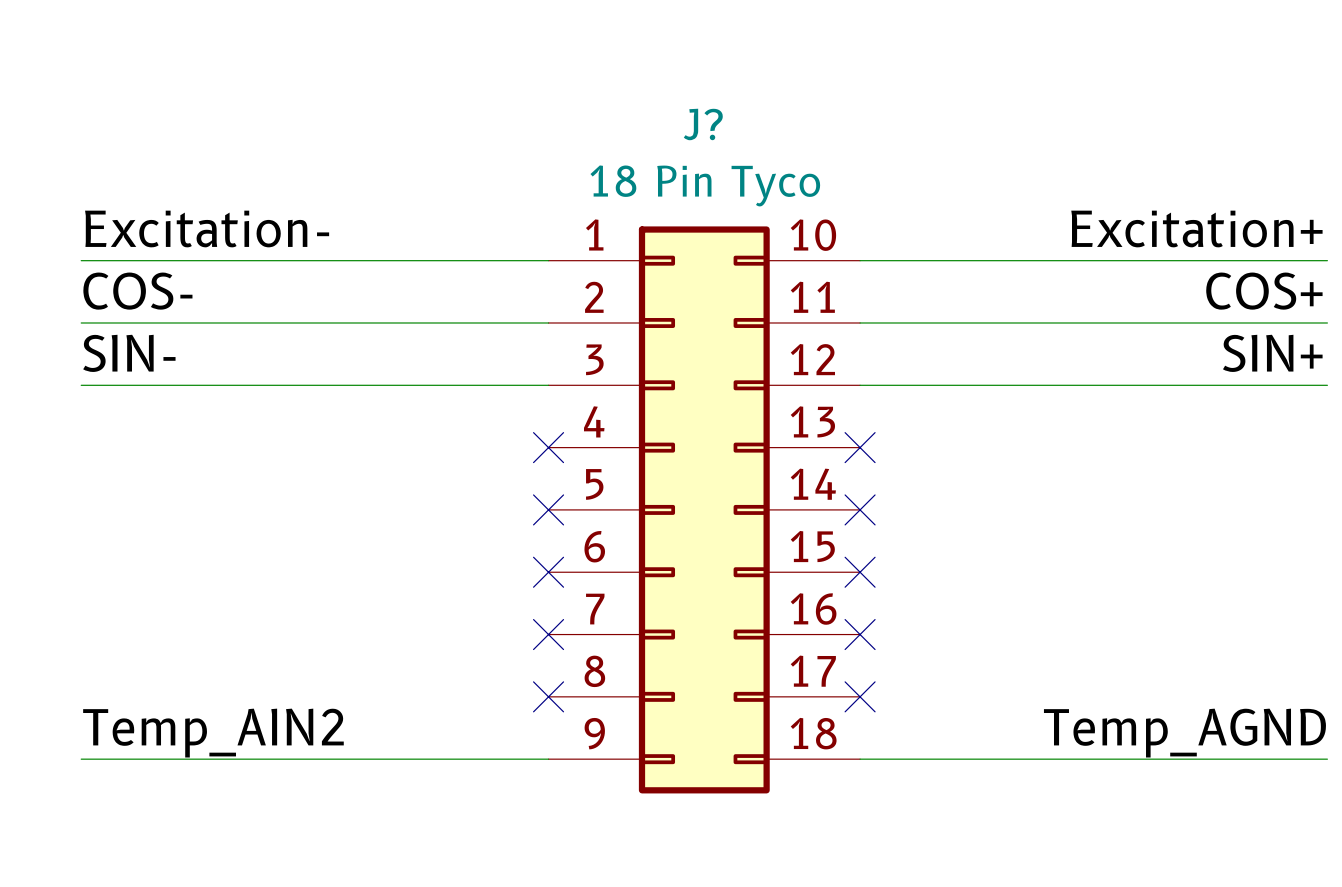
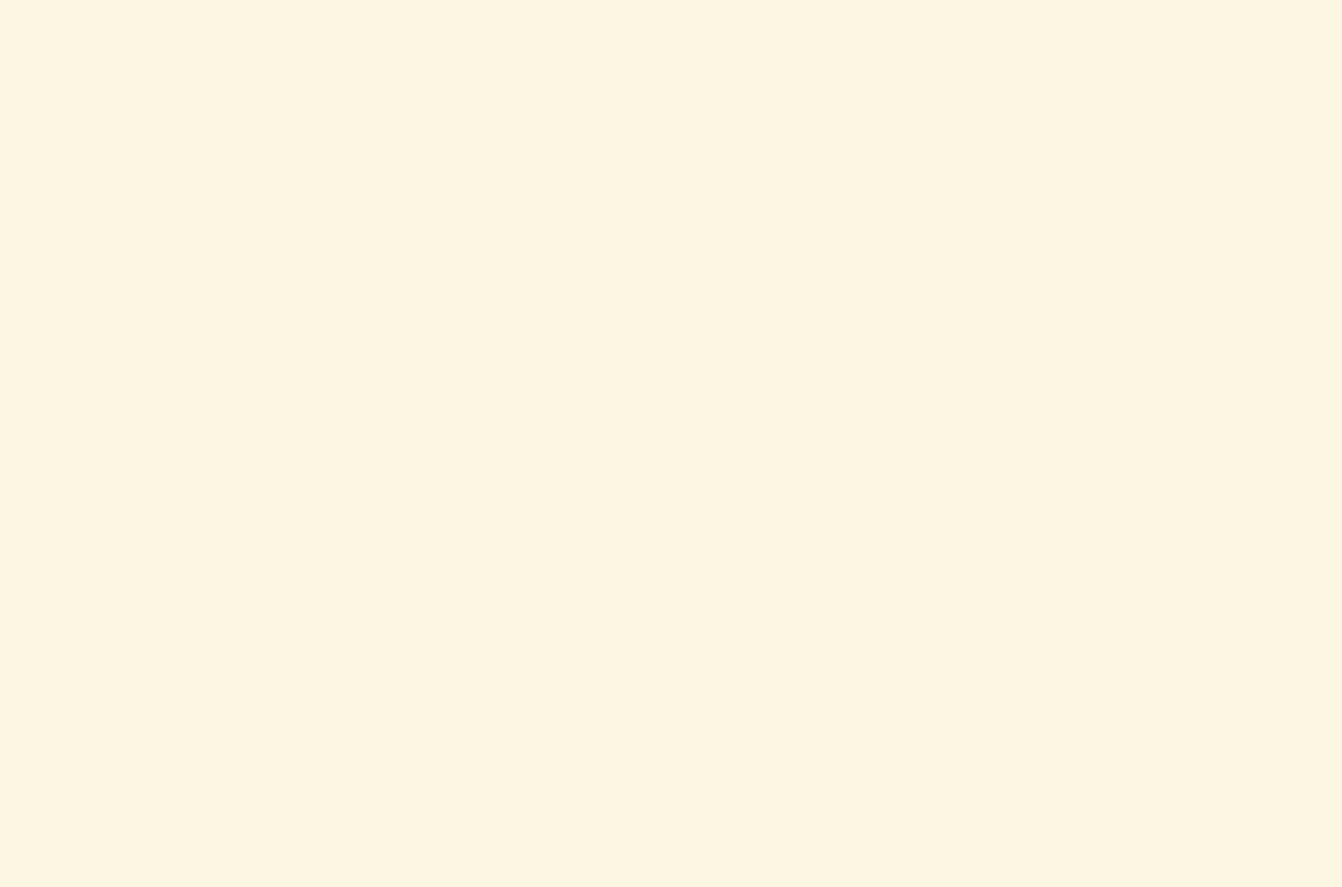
label: Excitation- (207, 228) -> none
label: Excitation+ (1196, 228) -> none
wire: (81, 260) (548, 260) -> none
wire: (860, 260) (1327, 260) -> none
label: COS- (137, 291) -> none
label: COS+ (1264, 291) -> none
wire: (81, 322) (548, 322) -> none
wire: (860, 322) (1327, 322) -> none
label: SIN- (129, 353) -> none
label: SIN+ (1272, 353) -> none
wire: (81, 385) (548, 385) -> none
wire: (860, 385) (1327, 385) -> none
no-connect mark: (548, 447) -> none
no-connect mark: (860, 447) -> none
no-connect mark: (548, 509) -> none
J?: 18 Pin Tyco (704, 509) -> none
no-connect mark: (860, 509) -> none
no-connect mark: (548, 572) -> none
no-connect mark: (860, 572) -> none
no-connect mark: (548, 634) -> none
no-connect mark: (860, 634) -> none
no-connect mark: (548, 696) -> none
no-connect mark: (860, 696) -> none
label: Temp_AIN2 (213, 733) -> none
label: Temp_AGND (1184, 733) -> none
wire: (81, 759) (548, 759) -> none
wire: (860, 759) (1327, 759) -> none

